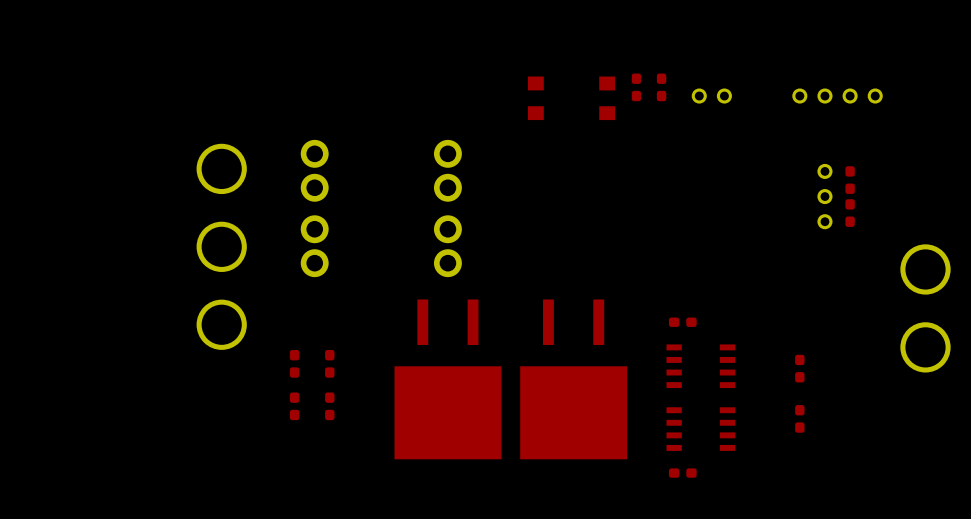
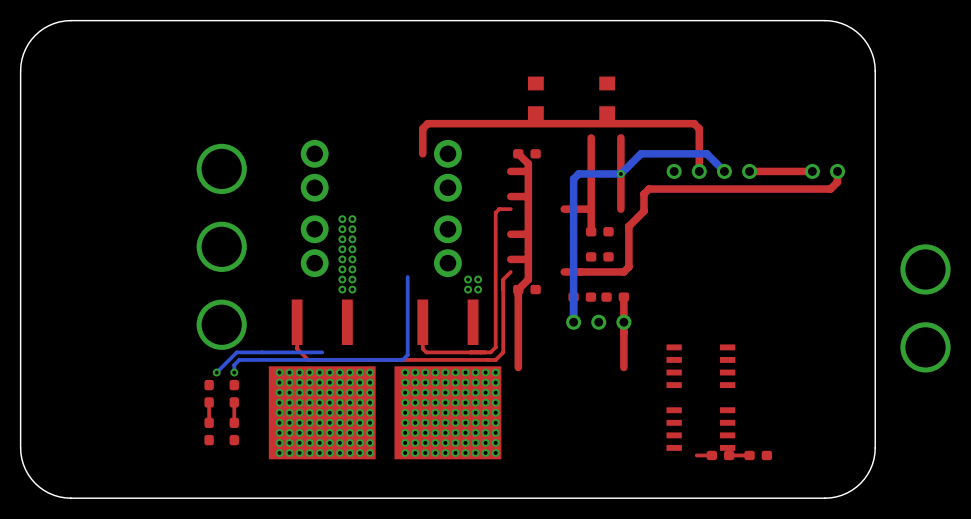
board edge: none -> (824, 20) (70, 20) (54, 23) (44, 28) (28, 44) (21, 59) (20, 70) (20, 447) (21, 459) (28, 474) (44, 490) (59, 496) (70, 498) (824, 498) (836, 496) (851, 490) (867, 474) (873, 459) (875, 447) (874, 65) (870, 49) (860, 35) (846, 25) (824, 20)
part: (636, 87) -> none
part: (661, 87) -> none
part position: (711, 96) -> (824, 171)
part position: (837, 96) -> (711, 171)
top track: none -> (591, 137) (591, 231)
top track: none -> (620, 137) (620, 209)
top track: none -> (422, 153) (422, 128) (427, 123) (694, 123) (699, 128) (699, 171)
top track: none -> (518, 153) (528, 163) (528, 279) (518, 289) (518, 367)
part: none -> (526, 153)
top track: none -> (528, 171) (510, 171)
bottom track: none -> (724, 171) (706, 153) (641, 153) (620, 173) (578, 173) (573, 178) (573, 322)
top track: none -> (812, 171) (749, 171)
top track: none -> (837, 171) (837, 182) (830, 189) (649, 189) (643, 194) (643, 211) (628, 226) (628, 266) (623, 271) (564, 271)
via: none -> (620, 173)
part: (850, 180) -> none
top track: none -> (528, 196) (510, 196)
part: (824, 196) -> none
top track: none -> (510, 209) (499, 209) (495, 212) (495, 347) (490, 352) (426, 352) (422, 348) (422, 322)
top track: none -> (591, 209) (564, 209)
part: (850, 213) -> none
via: none -> (342, 219)
via: none -> (352, 219)
via: none -> (342, 229)
via: none -> (352, 229)
part: none -> (599, 231)
top track: none -> (528, 234) (510, 234)
via: none -> (342, 239)
via: none -> (352, 239)
via: none -> (342, 249)
via: none -> (352, 249)
part: none -> (599, 256)
via: none -> (342, 259)
via: none -> (352, 259)
top track: none -> (528, 259) (510, 259)
via: none -> (342, 269)
via: none -> (352, 269)
top track: none -> (510, 271) (503, 279) (503, 352) (495, 359) (308, 359) (297, 348) (297, 322)
bottom track: none -> (407, 277) (407, 354) (402, 359) (239, 359) (234, 364) (234, 372)
via: none -> (342, 279)
via: none -> (352, 279)
via: none -> (468, 279)
via: none -> (478, 279)
via: none -> (342, 289)
via: none -> (352, 289)
via: none -> (468, 289)
via: none -> (478, 289)
part: none -> (526, 289)
part: none -> (582, 297)
part: none -> (615, 297)
top track: none -> (623, 297) (623, 367)
part: none -> (598, 322)
part: (682, 322) -> none
bottom track: none -> (322, 352) (236, 352) (216, 372)
part: (294, 363) -> none
part: (329, 363) -> none
part: (799, 368) -> none
via: none -> (216, 372)
via: none -> (234, 372)
via: none -> (279, 372)
via: none -> (289, 372)
via: none -> (299, 372)
via: none -> (309, 372)
via: none -> (319, 372)
via: none -> (329, 372)
via: none -> (339, 372)
via: none -> (349, 372)
via: none -> (359, 372)
via: none -> (370, 372)
via: none -> (405, 372)
via: none -> (415, 372)
via: none -> (425, 372)
via: none -> (435, 372)
via: none -> (445, 372)
via: none -> (455, 372)
via: none -> (465, 372)
via: none -> (475, 372)
via: none -> (485, 372)
via: none -> (495, 372)
part: none -> (322, 379)
part: (573, 379) -> none
via: none -> (279, 382)
via: none -> (289, 382)
via: none -> (299, 382)
via: none -> (309, 382)
via: none -> (319, 382)
via: none -> (329, 382)
via: none -> (339, 382)
via: none -> (349, 382)
via: none -> (359, 382)
via: none -> (370, 382)
via: none -> (405, 382)
via: none -> (415, 382)
via: none -> (425, 382)
via: none -> (435, 382)
via: none -> (445, 382)
via: none -> (455, 382)
via: none -> (465, 382)
via: none -> (475, 382)
via: none -> (485, 382)
via: none -> (495, 382)
via: none -> (279, 392)
via: none -> (289, 392)
via: none -> (299, 392)
via: none -> (309, 392)
via: none -> (319, 392)
via: none -> (329, 392)
via: none -> (339, 392)
via: none -> (349, 392)
via: none -> (359, 392)
via: none -> (370, 392)
via: none -> (405, 392)
via: none -> (415, 392)
via: none -> (425, 392)
via: none -> (435, 392)
via: none -> (445, 392)
via: none -> (455, 392)
via: none -> (465, 392)
via: none -> (475, 392)
via: none -> (485, 392)
via: none -> (495, 392)
part: none -> (209, 393)
part: none -> (234, 393)
top track: none -> (209, 402) (209, 422)
top track: none -> (234, 402) (234, 422)
via: none -> (279, 402)
via: none -> (289, 402)
via: none -> (299, 402)
via: none -> (309, 402)
via: none -> (319, 402)
via: none -> (329, 402)
via: none -> (339, 402)
via: none -> (349, 402)
via: none -> (359, 402)
via: none -> (370, 402)
via: none -> (405, 402)
via: none -> (415, 402)
via: none -> (425, 402)
via: none -> (435, 402)
via: none -> (445, 402)
via: none -> (455, 402)
via: none -> (465, 402)
via: none -> (475, 402)
via: none -> (485, 402)
via: none -> (495, 402)
part: (294, 406) -> none
part: (329, 406) -> none
via: none -> (279, 412)
via: none -> (289, 412)
via: none -> (299, 412)
via: none -> (309, 412)
via: none -> (319, 412)
via: none -> (329, 412)
via: none -> (339, 412)
via: none -> (349, 412)
via: none -> (359, 412)
via: none -> (370, 412)
via: none -> (405, 412)
via: none -> (415, 412)
via: none -> (425, 412)
via: none -> (435, 412)
via: none -> (445, 412)
via: none -> (455, 412)
via: none -> (465, 412)
via: none -> (475, 412)
via: none -> (485, 412)
via: none -> (495, 412)
part: (799, 418) -> none
via: none -> (279, 422)
via: none -> (289, 422)
via: none -> (299, 422)
via: none -> (309, 422)
via: none -> (319, 422)
via: none -> (329, 422)
via: none -> (339, 422)
via: none -> (349, 422)
via: none -> (359, 422)
via: none -> (370, 422)
via: none -> (405, 422)
via: none -> (415, 422)
via: none -> (425, 422)
via: none -> (435, 422)
via: none -> (445, 422)
via: none -> (455, 422)
via: none -> (465, 422)
via: none -> (475, 422)
via: none -> (485, 422)
via: none -> (495, 422)
part: none -> (209, 431)
part: none -> (234, 431)
via: none -> (279, 432)
via: none -> (289, 432)
via: none -> (299, 432)
via: none -> (309, 432)
via: none -> (319, 432)
via: none -> (329, 432)
via: none -> (339, 432)
via: none -> (349, 432)
via: none -> (359, 432)
via: none -> (370, 432)
via: none -> (405, 432)
via: none -> (415, 432)
via: none -> (425, 432)
via: none -> (435, 432)
via: none -> (445, 432)
via: none -> (455, 432)
via: none -> (465, 432)
via: none -> (475, 432)
via: none -> (485, 432)
via: none -> (495, 432)
via: none -> (279, 442)
via: none -> (289, 442)
via: none -> (299, 442)
via: none -> (309, 442)
via: none -> (319, 442)
via: none -> (329, 442)
via: none -> (339, 442)
via: none -> (349, 442)
via: none -> (359, 442)
via: none -> (370, 442)
via: none -> (405, 442)
via: none -> (415, 442)
via: none -> (425, 442)
via: none -> (435, 442)
via: none -> (445, 442)
via: none -> (455, 442)
via: none -> (465, 442)
via: none -> (475, 442)
via: none -> (485, 442)
via: none -> (495, 442)
via: none -> (279, 452)
via: none -> (289, 452)
via: none -> (299, 452)
via: none -> (309, 452)
via: none -> (319, 452)
via: none -> (329, 452)
via: none -> (339, 452)
via: none -> (349, 452)
via: none -> (359, 452)
via: none -> (370, 452)
via: none -> (405, 452)
via: none -> (415, 452)
via: none -> (425, 452)
via: none -> (435, 452)
via: none -> (445, 452)
via: none -> (455, 452)
via: none -> (465, 452)
via: none -> (475, 452)
via: none -> (485, 452)
via: none -> (495, 452)
top track: none -> (711, 455) (696, 455)
part: none -> (720, 455)
top track: none -> (749, 455) (729, 455)
part: none -> (758, 455)
part: (682, 473) -> none

